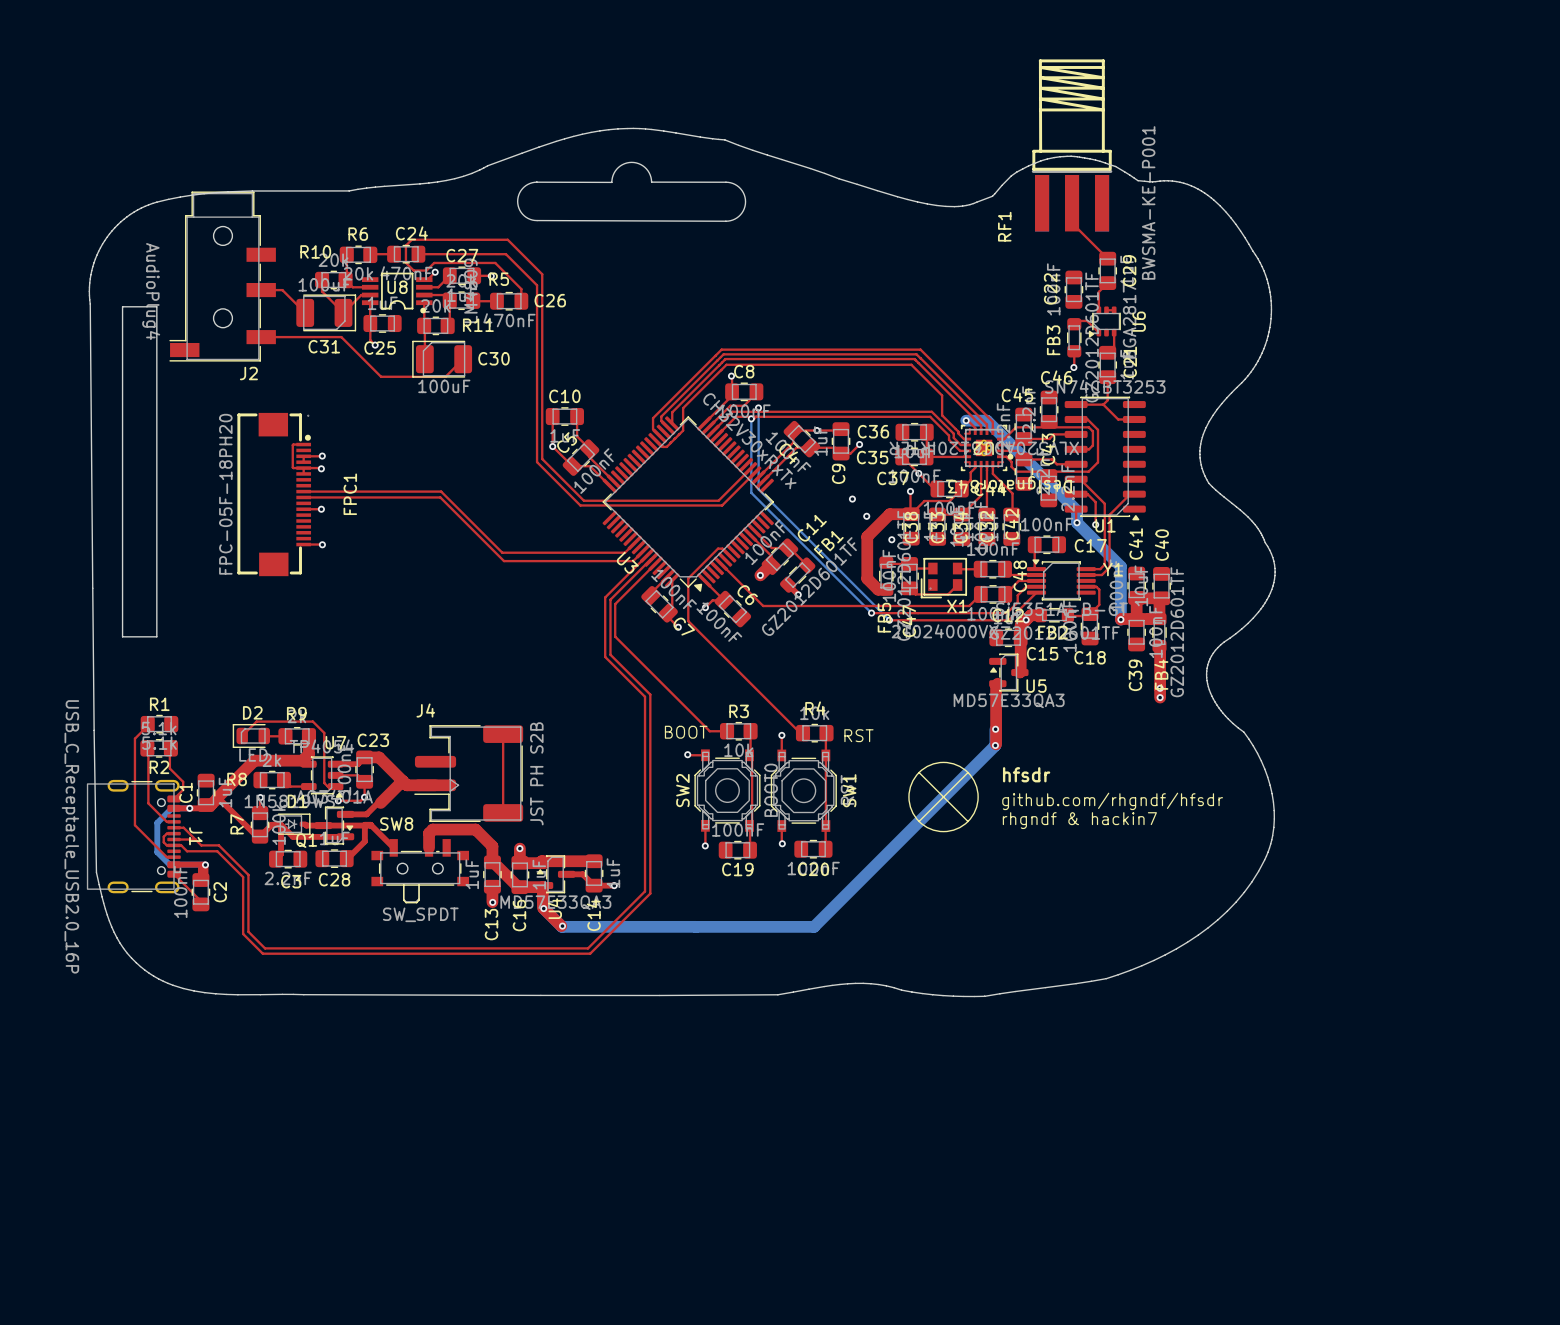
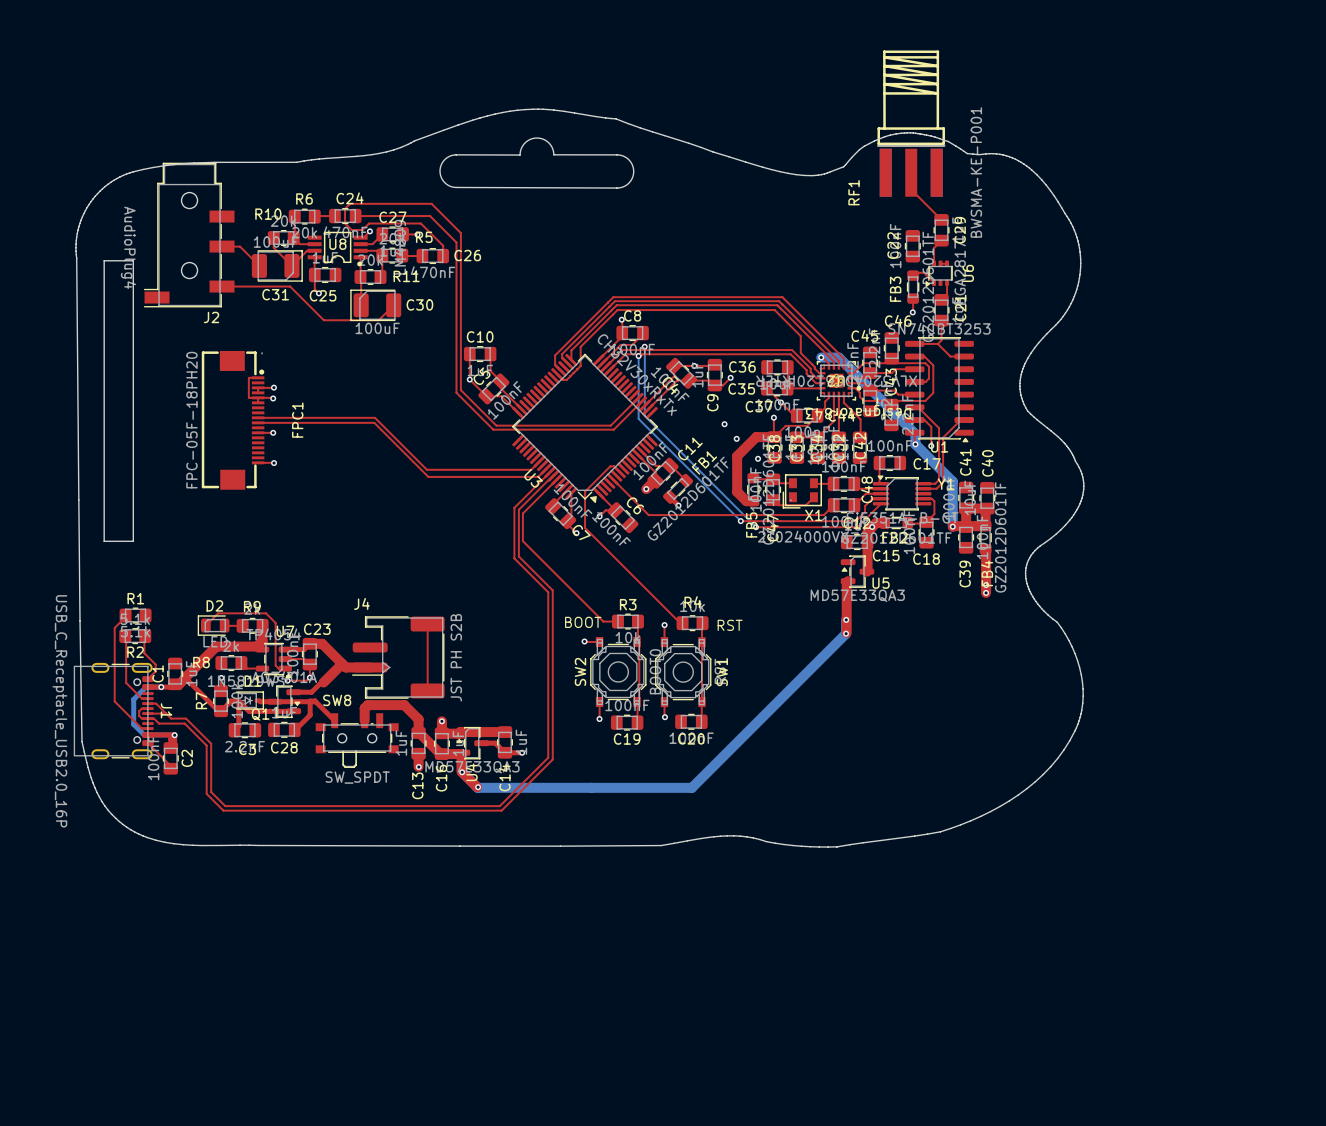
drawing: [908, 761, 979, 833] -> none
line: (919, 772) (967, 821) -> none
line: (967, 772) (919, 821) -> none
text: hfsdr (1026, 774) -> none
text: github.com/rhgndf/hfsdr (1112, 801) -> none
text: rhgndf & hackin7 (1079, 820) -> none

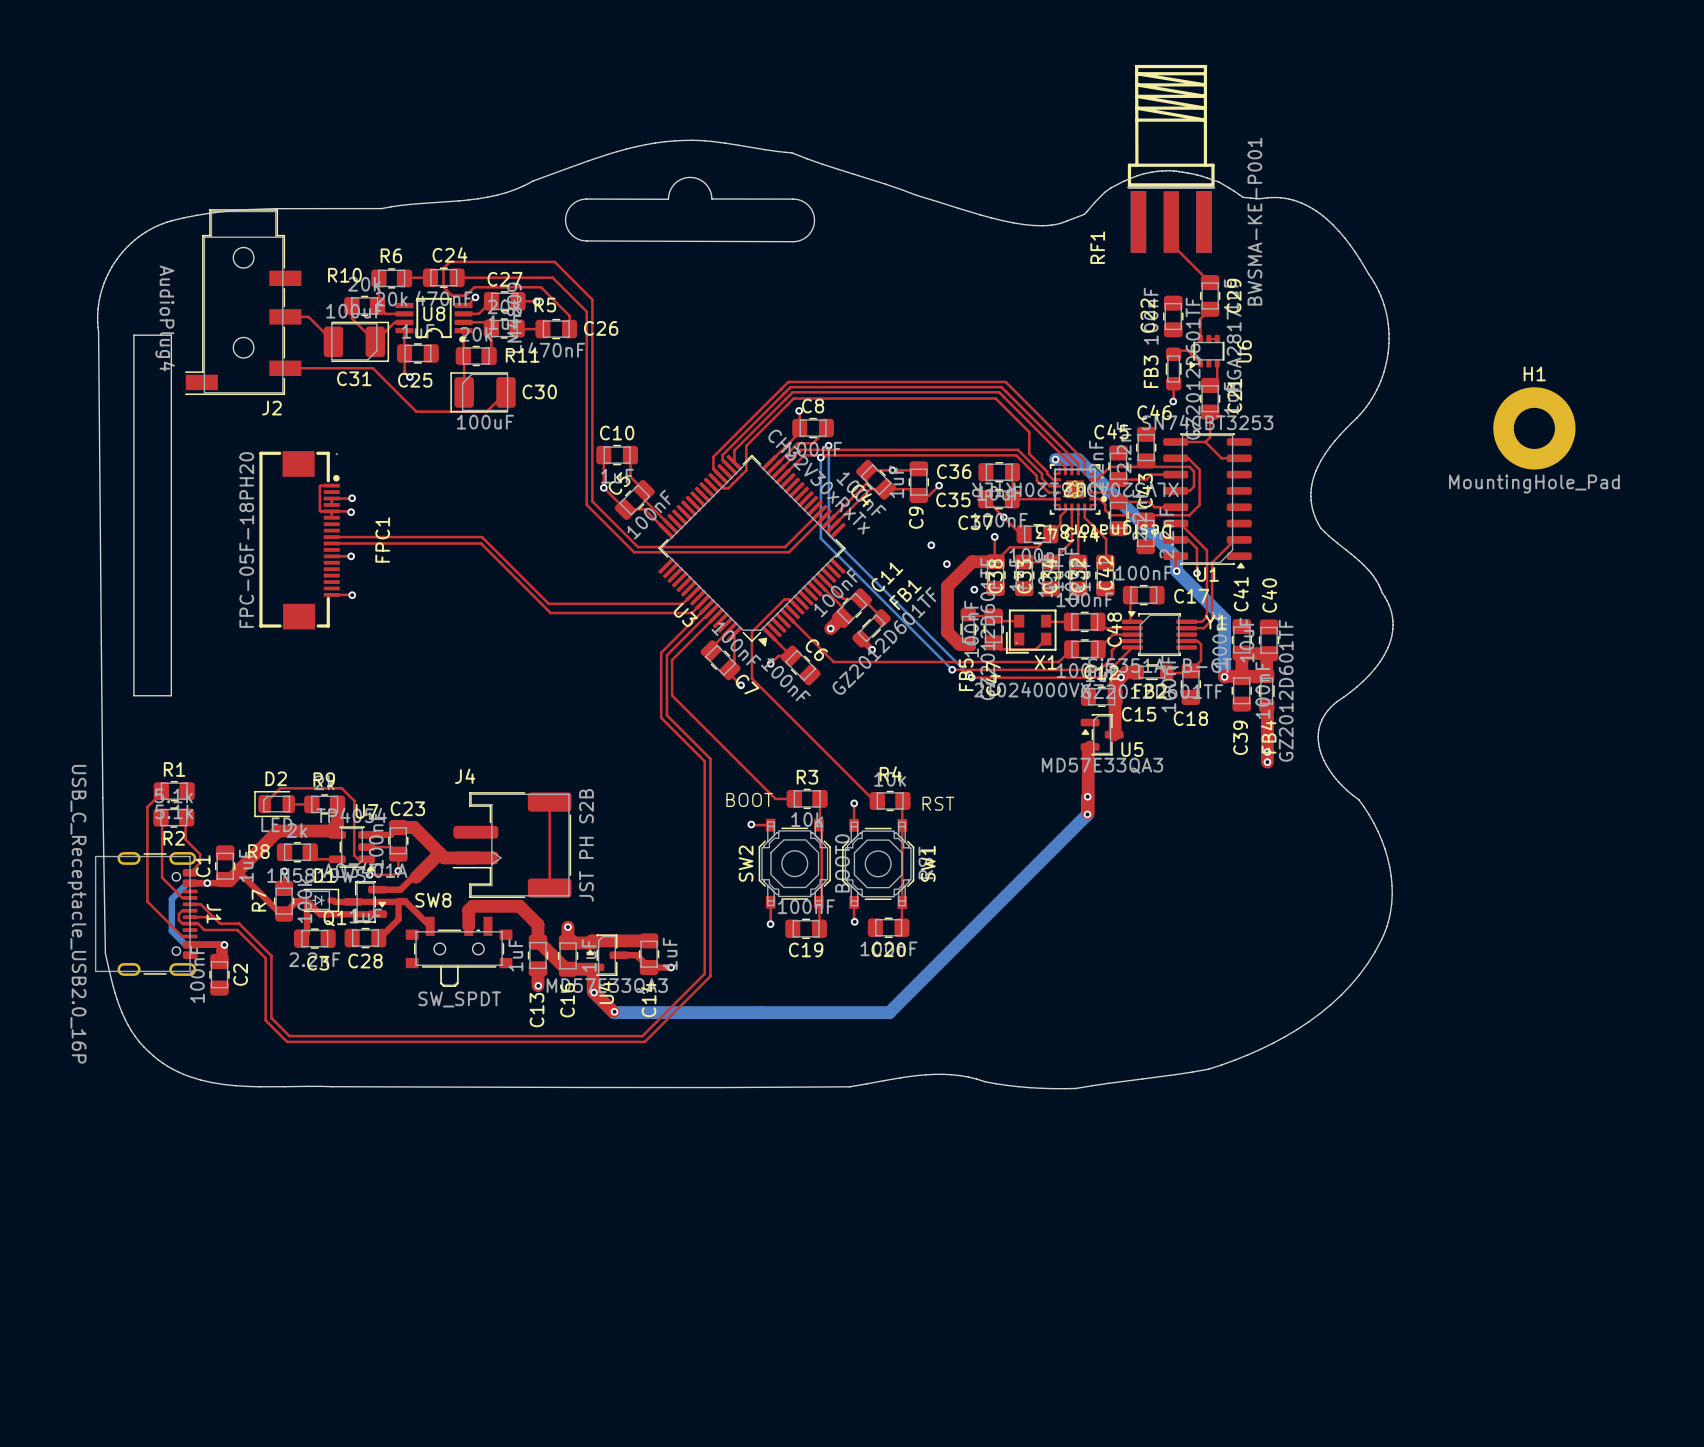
H1: none -> MountingHole_Pad (1534, 428)
top track: (147, 743) (170, 765) (170, 768) -> none

